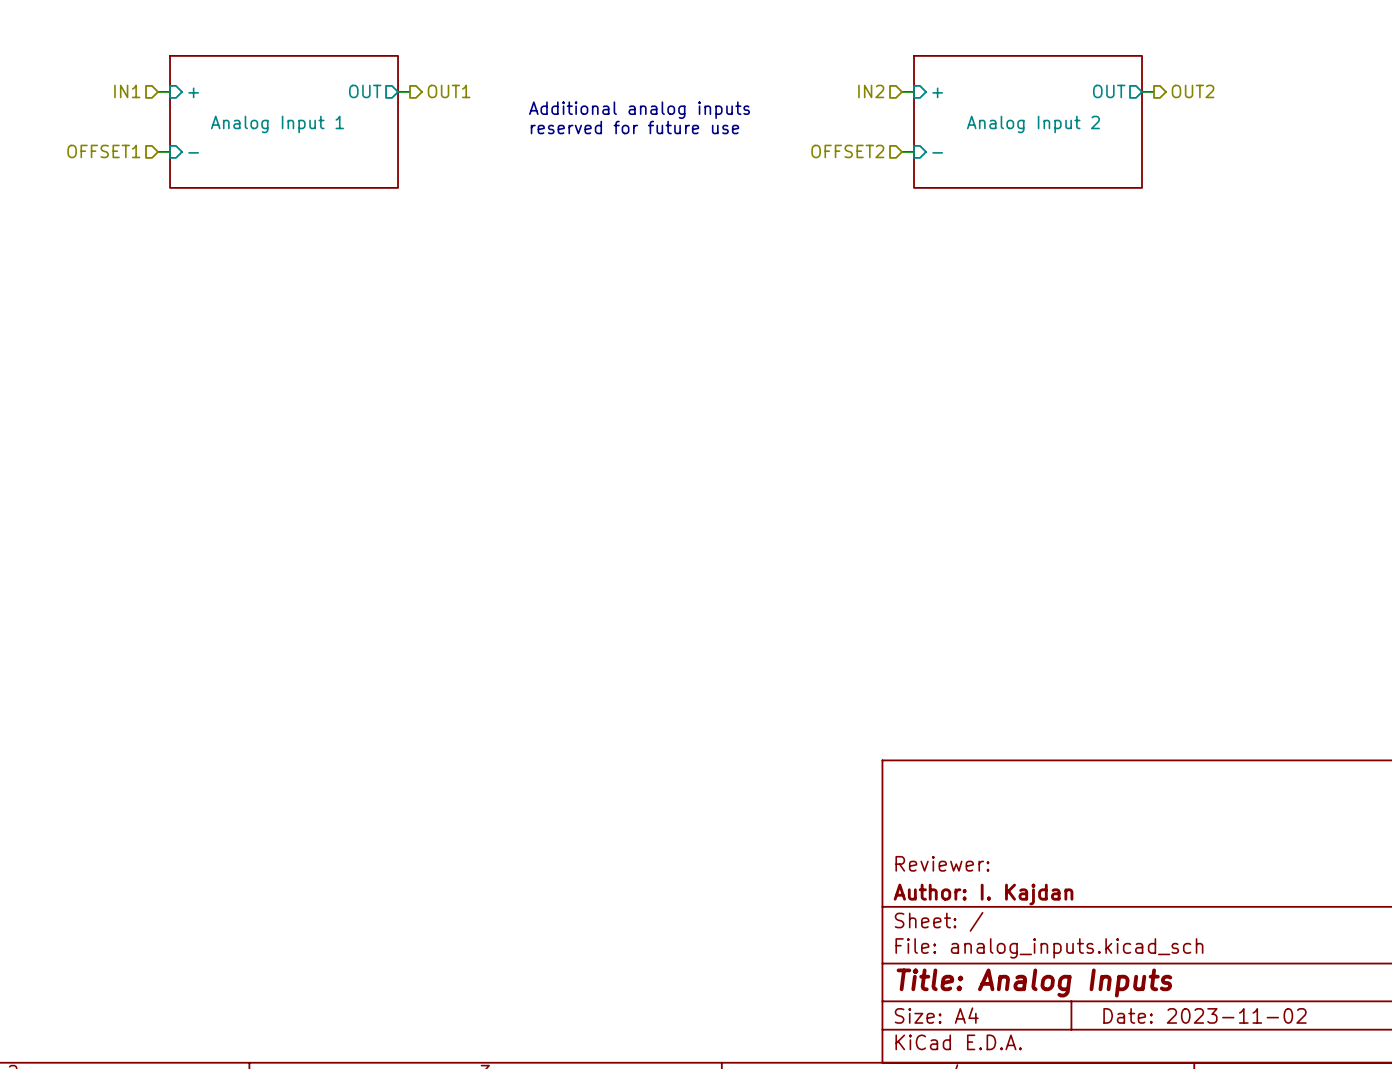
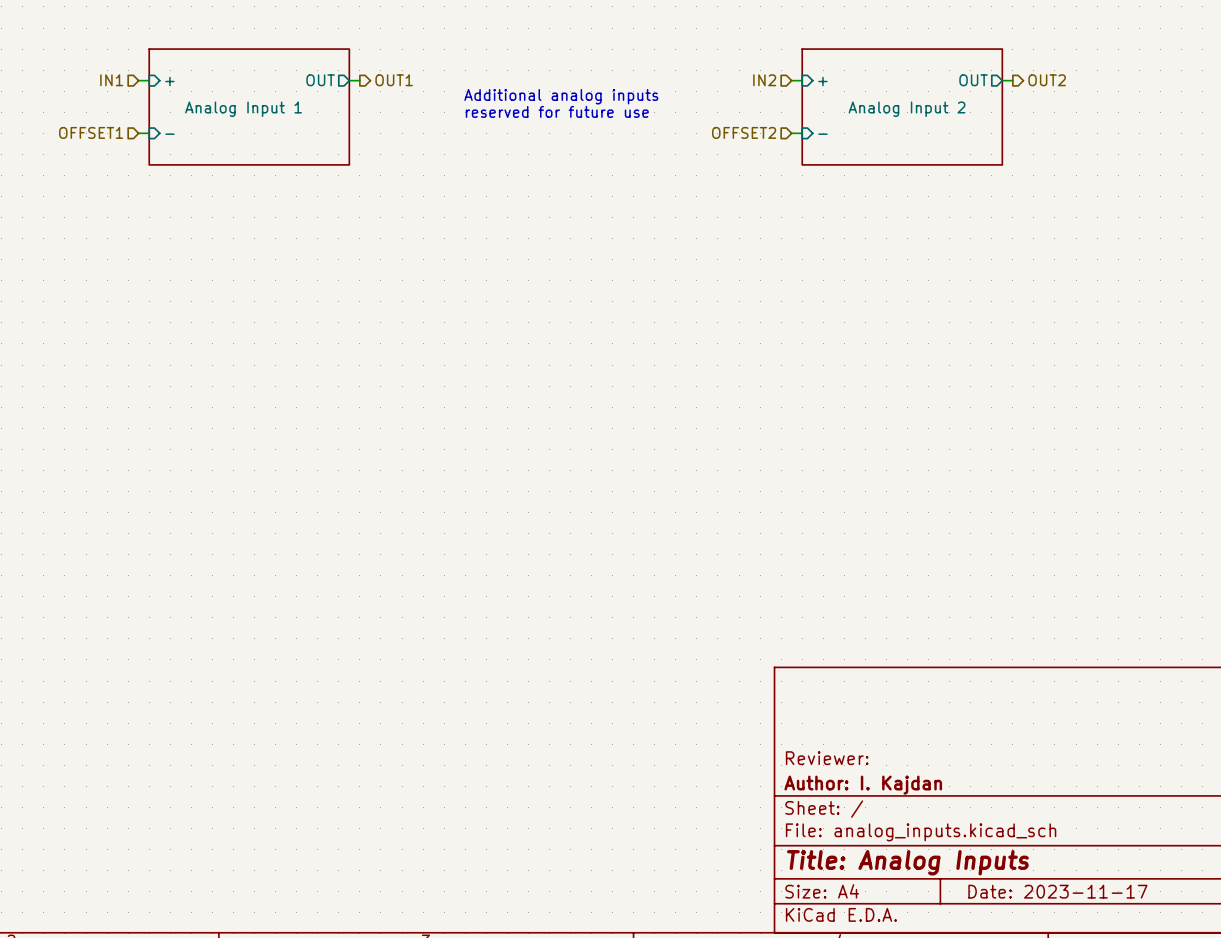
title block: Date: 2023-11-02 (1204, 1015) -> Date: 2023-11-17 (1057, 891)

